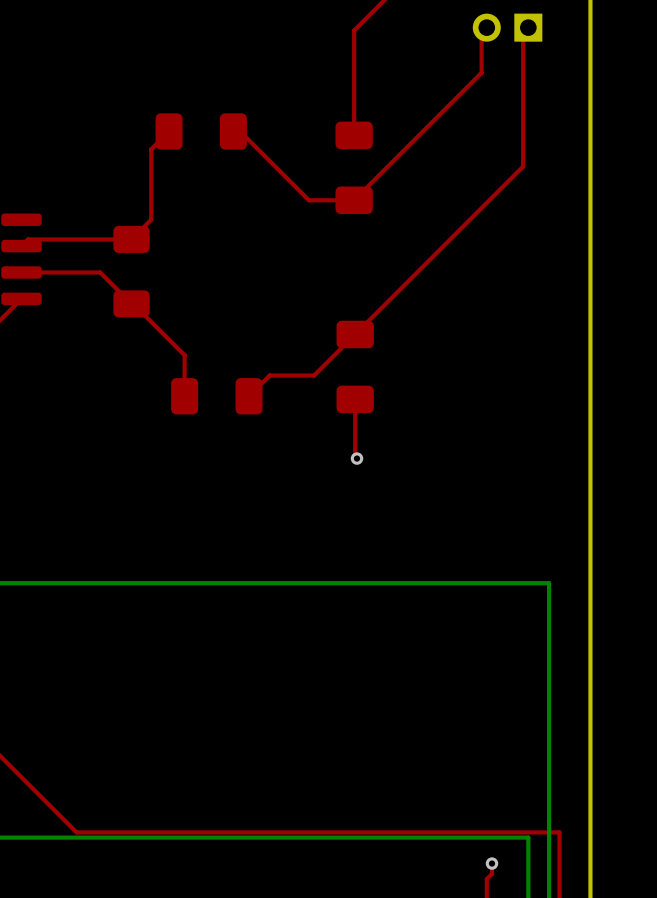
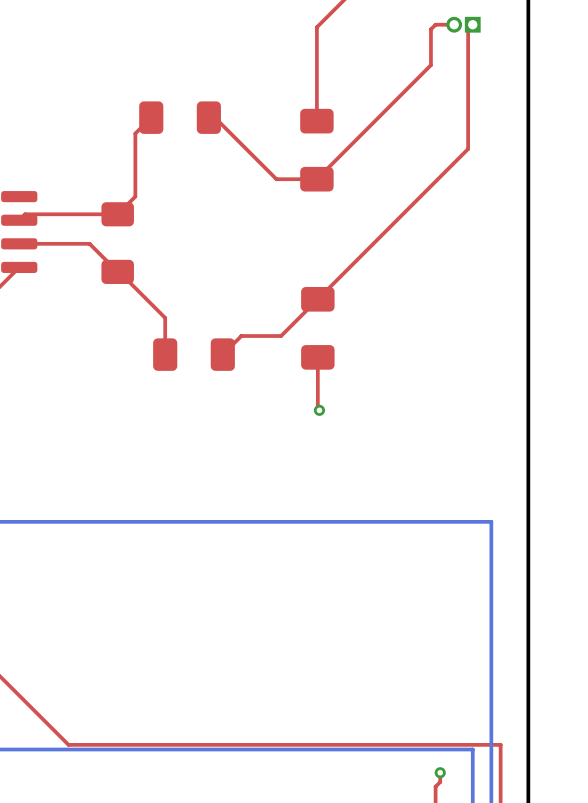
part footprint: [472, 13, 543, 42] -> [446, 16, 481, 33]
top track: none -> (454, 24) (435, 24)

